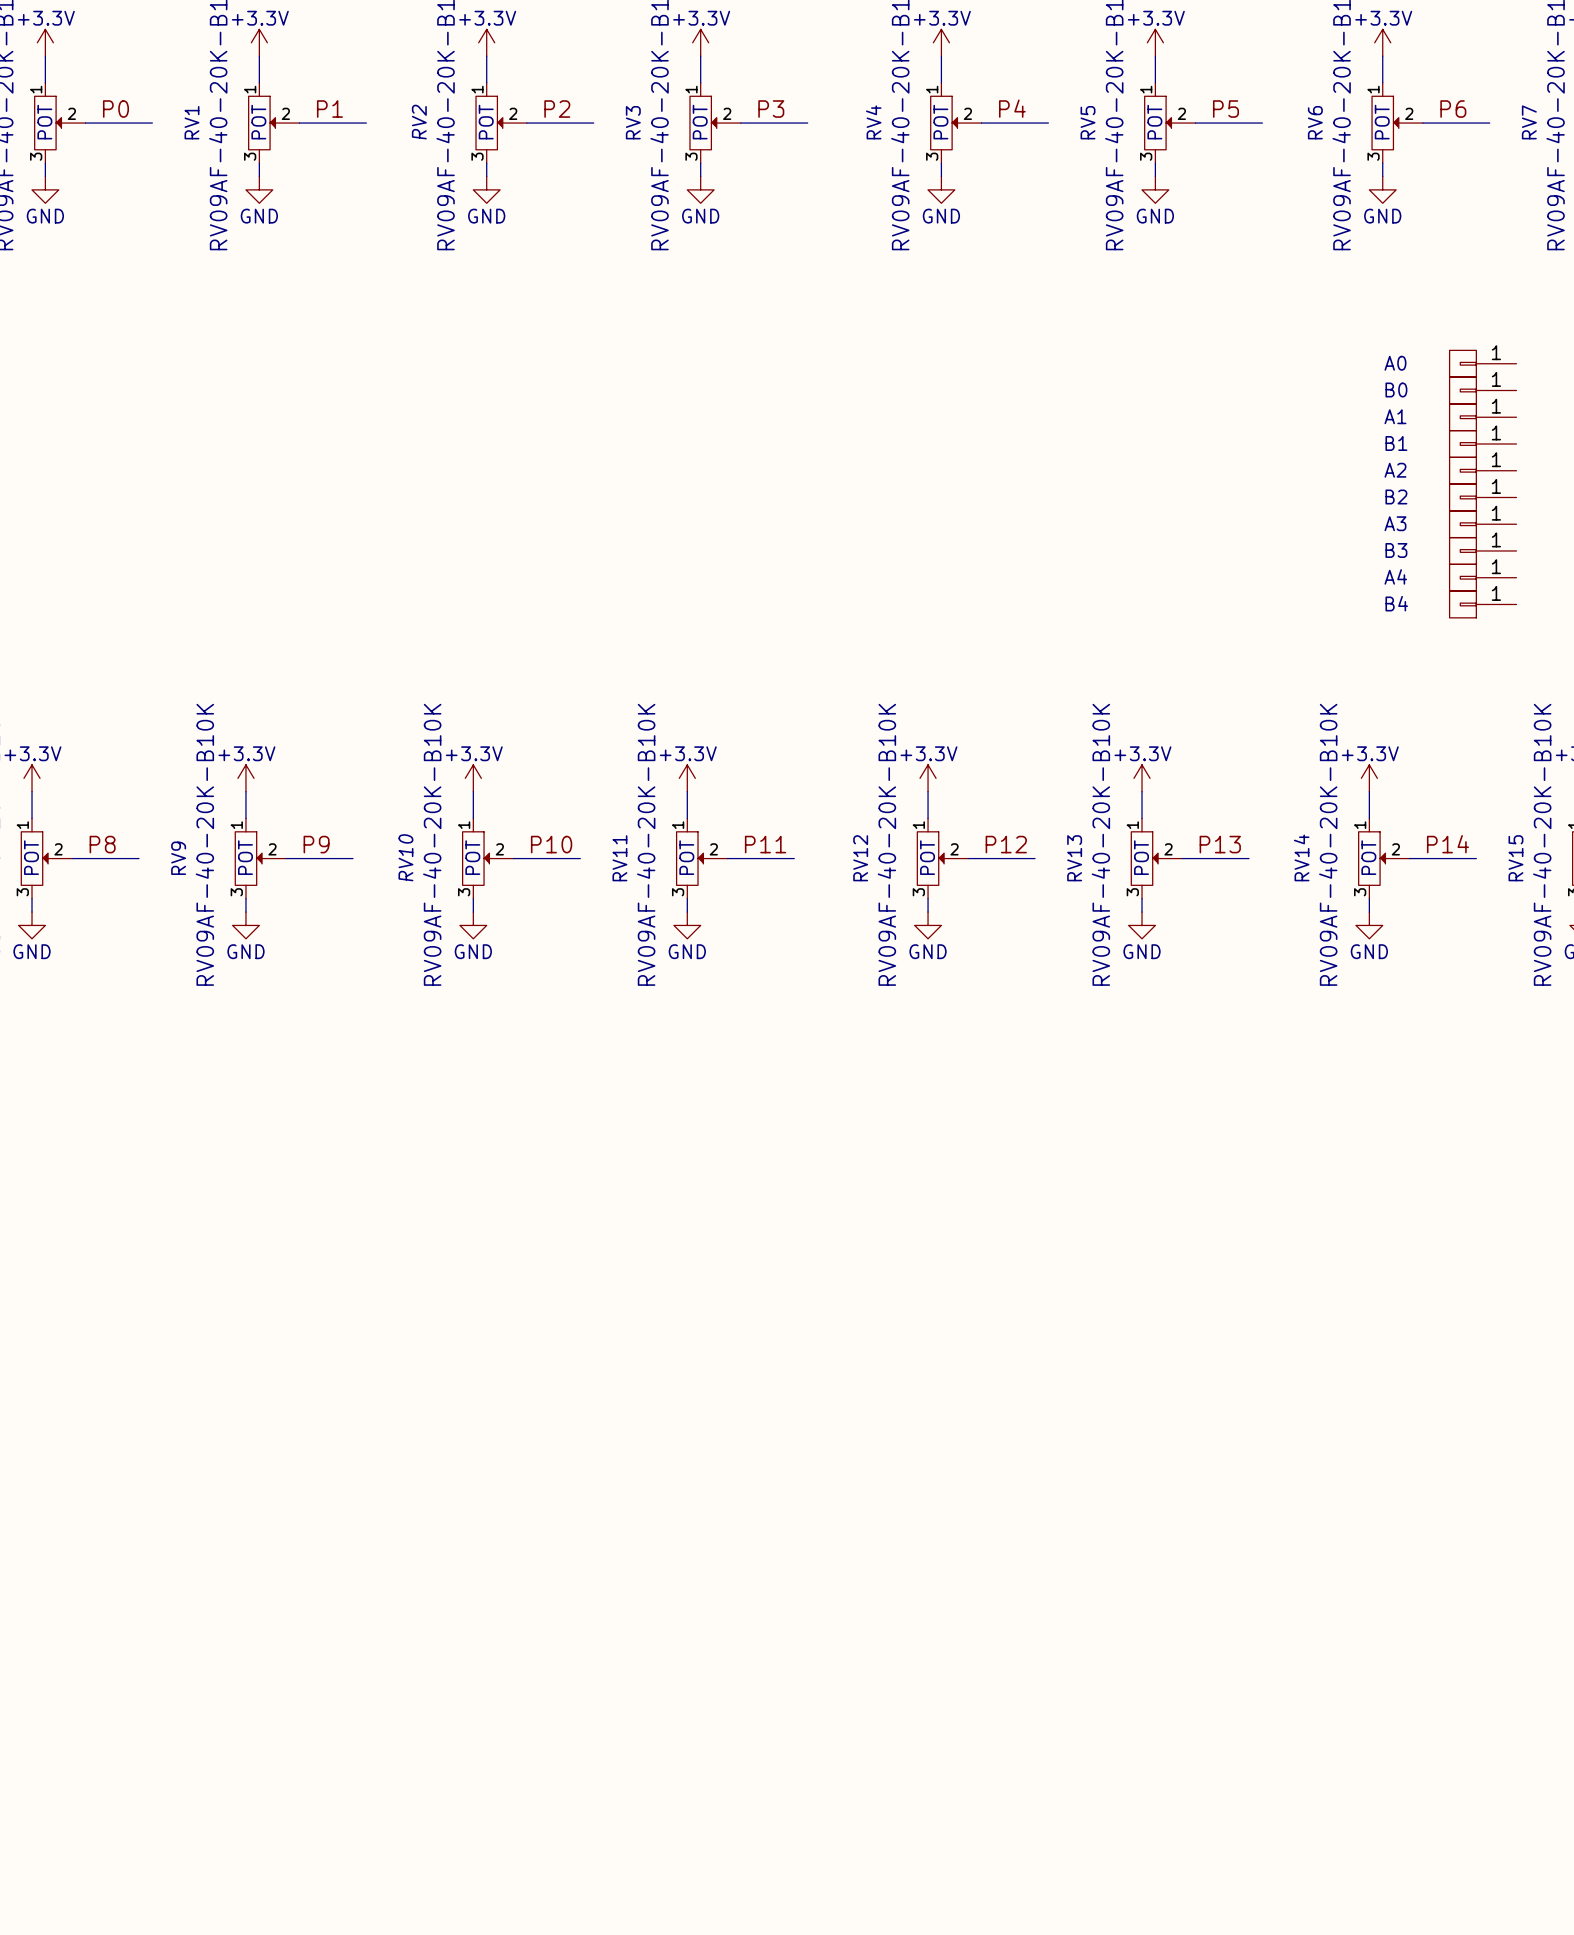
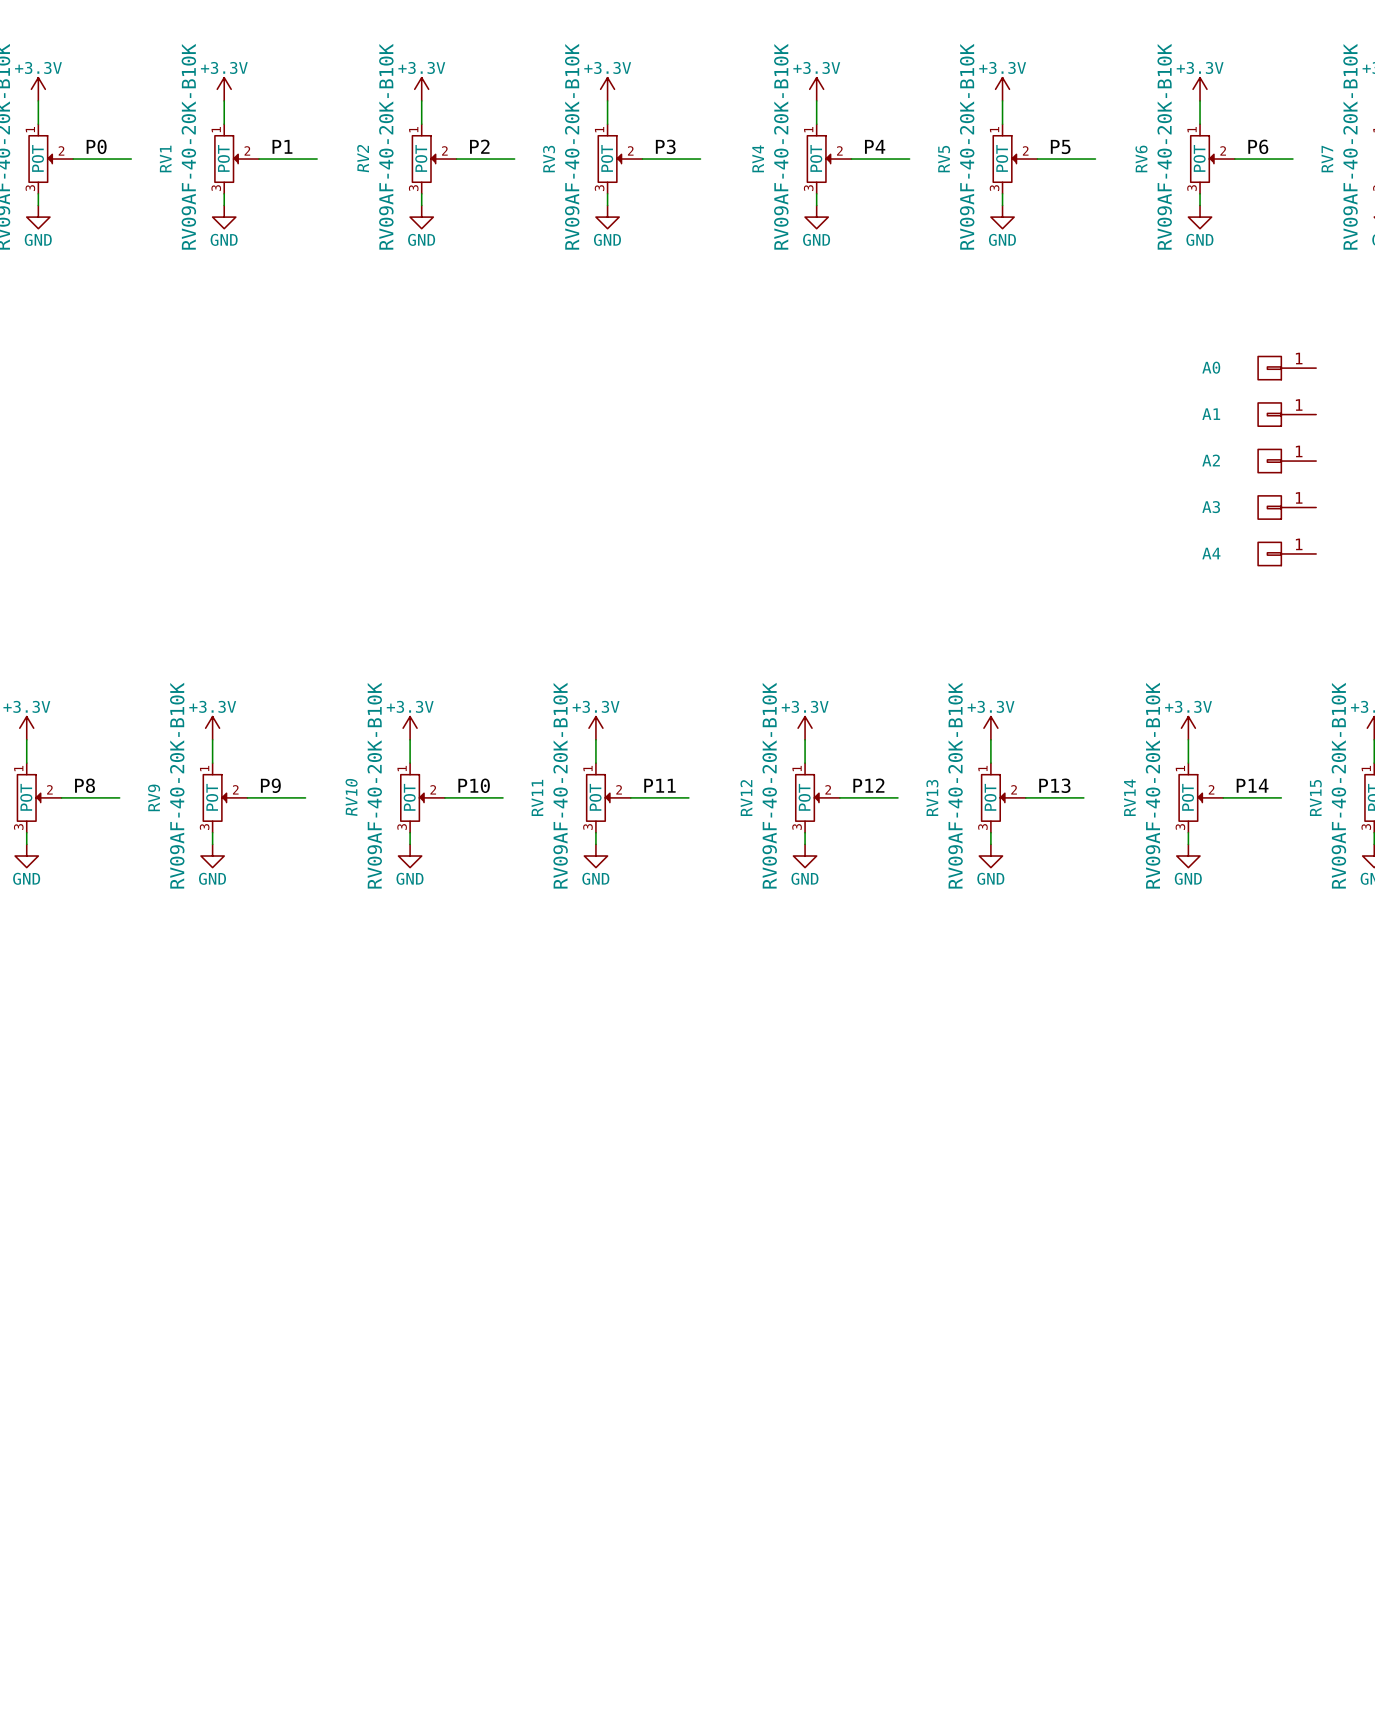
B0: (1483, 390) -> none
B1: (1483, 443) -> none
B2: (1483, 497) -> none
B3: (1483, 550) -> none
B4: (1483, 604) -> none

